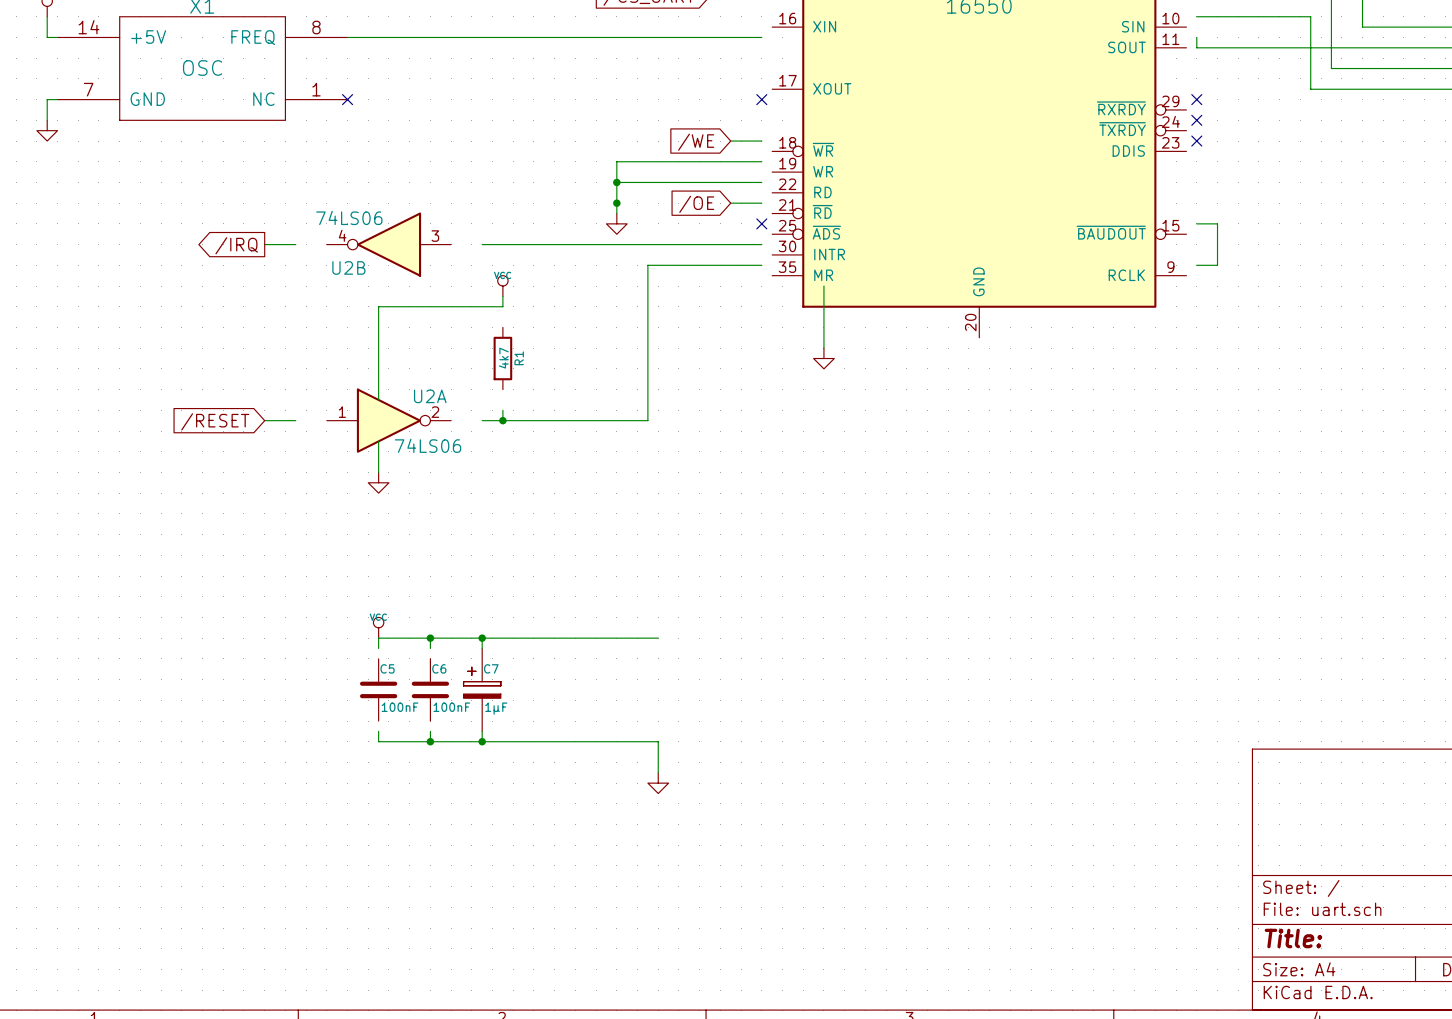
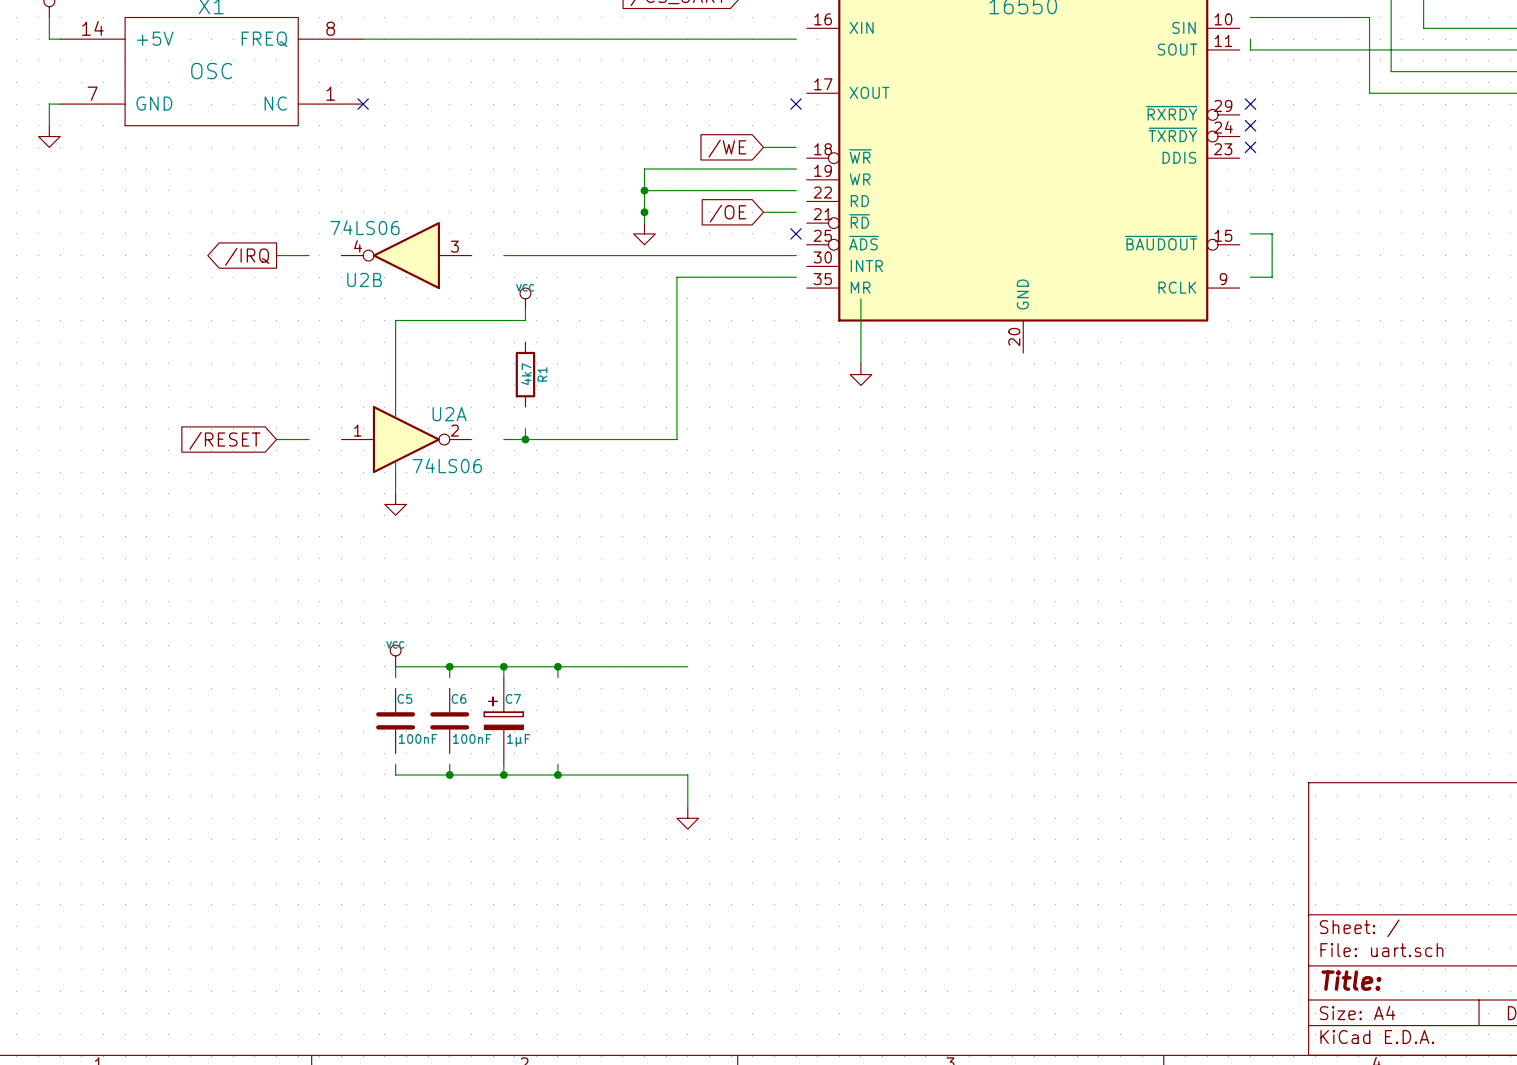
wire: none -> (557, 666) (557, 677)
junction: none -> (557, 666)
wire: none -> (557, 764) (557, 774)
junction: none -> (557, 774)

